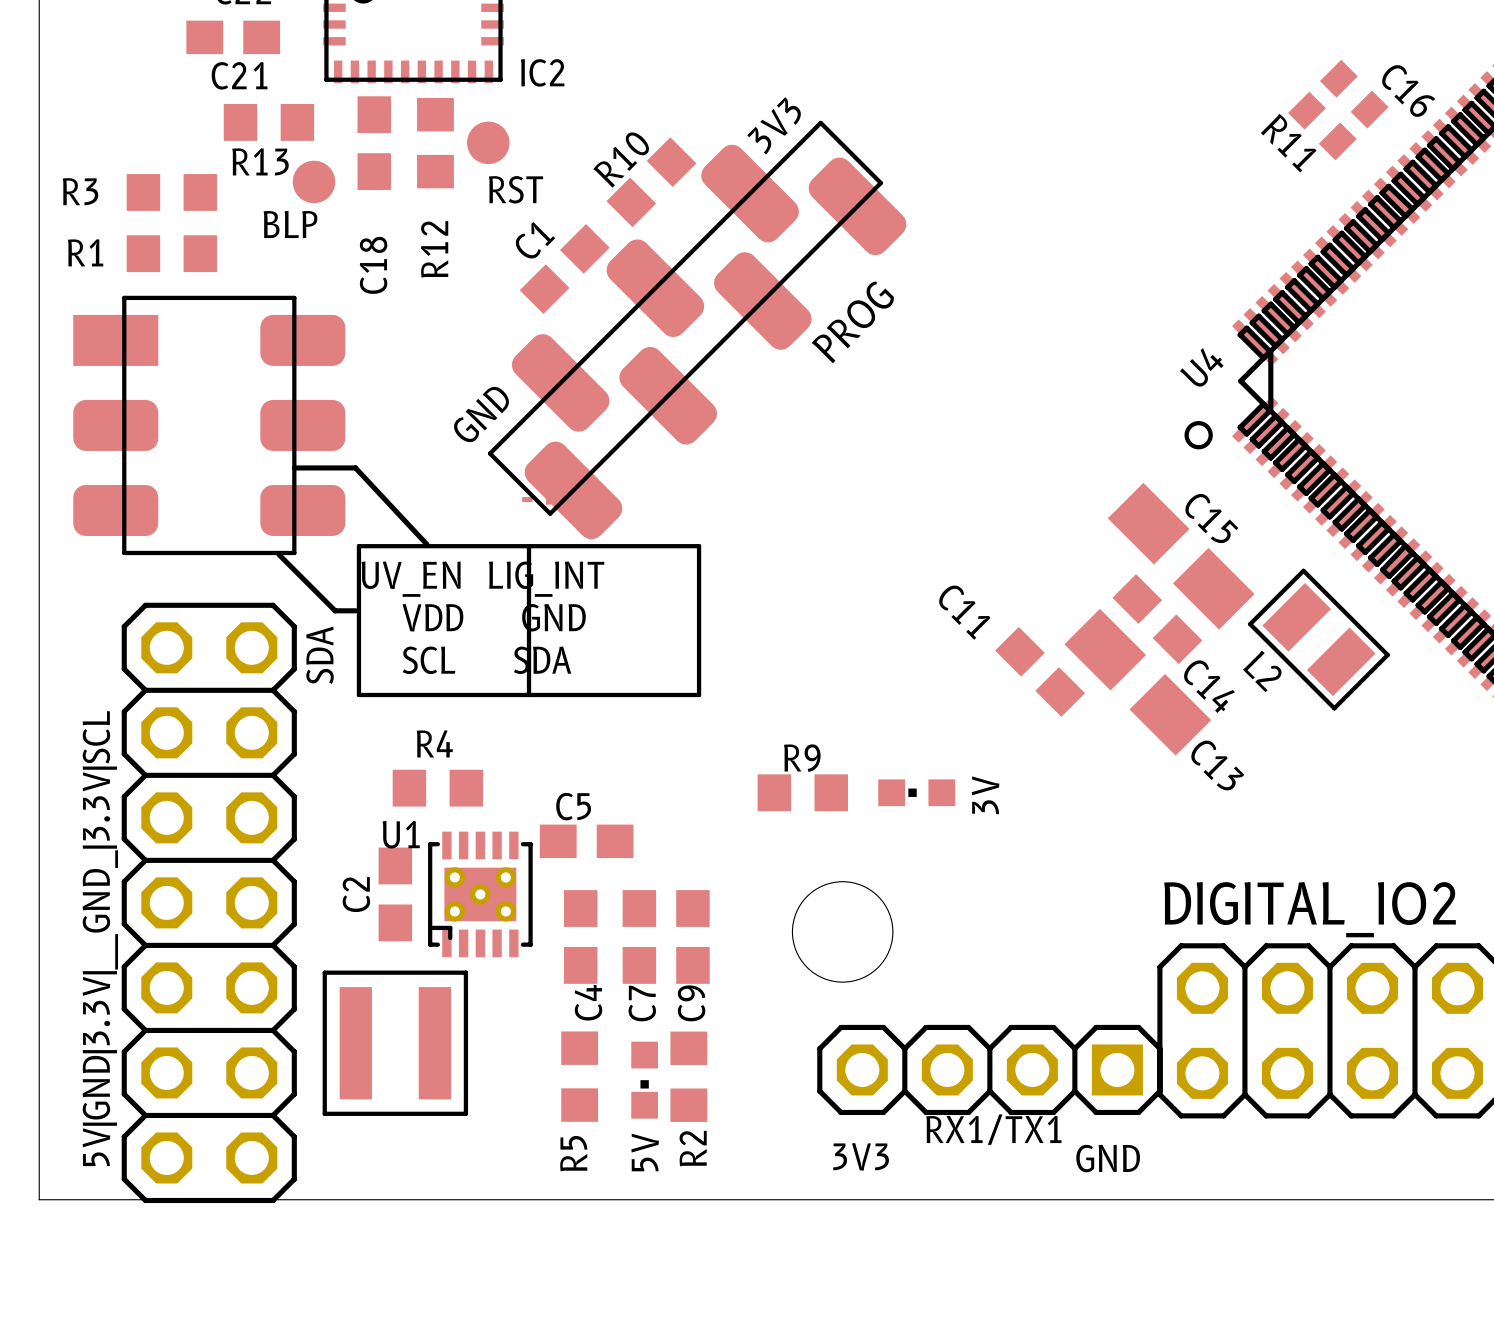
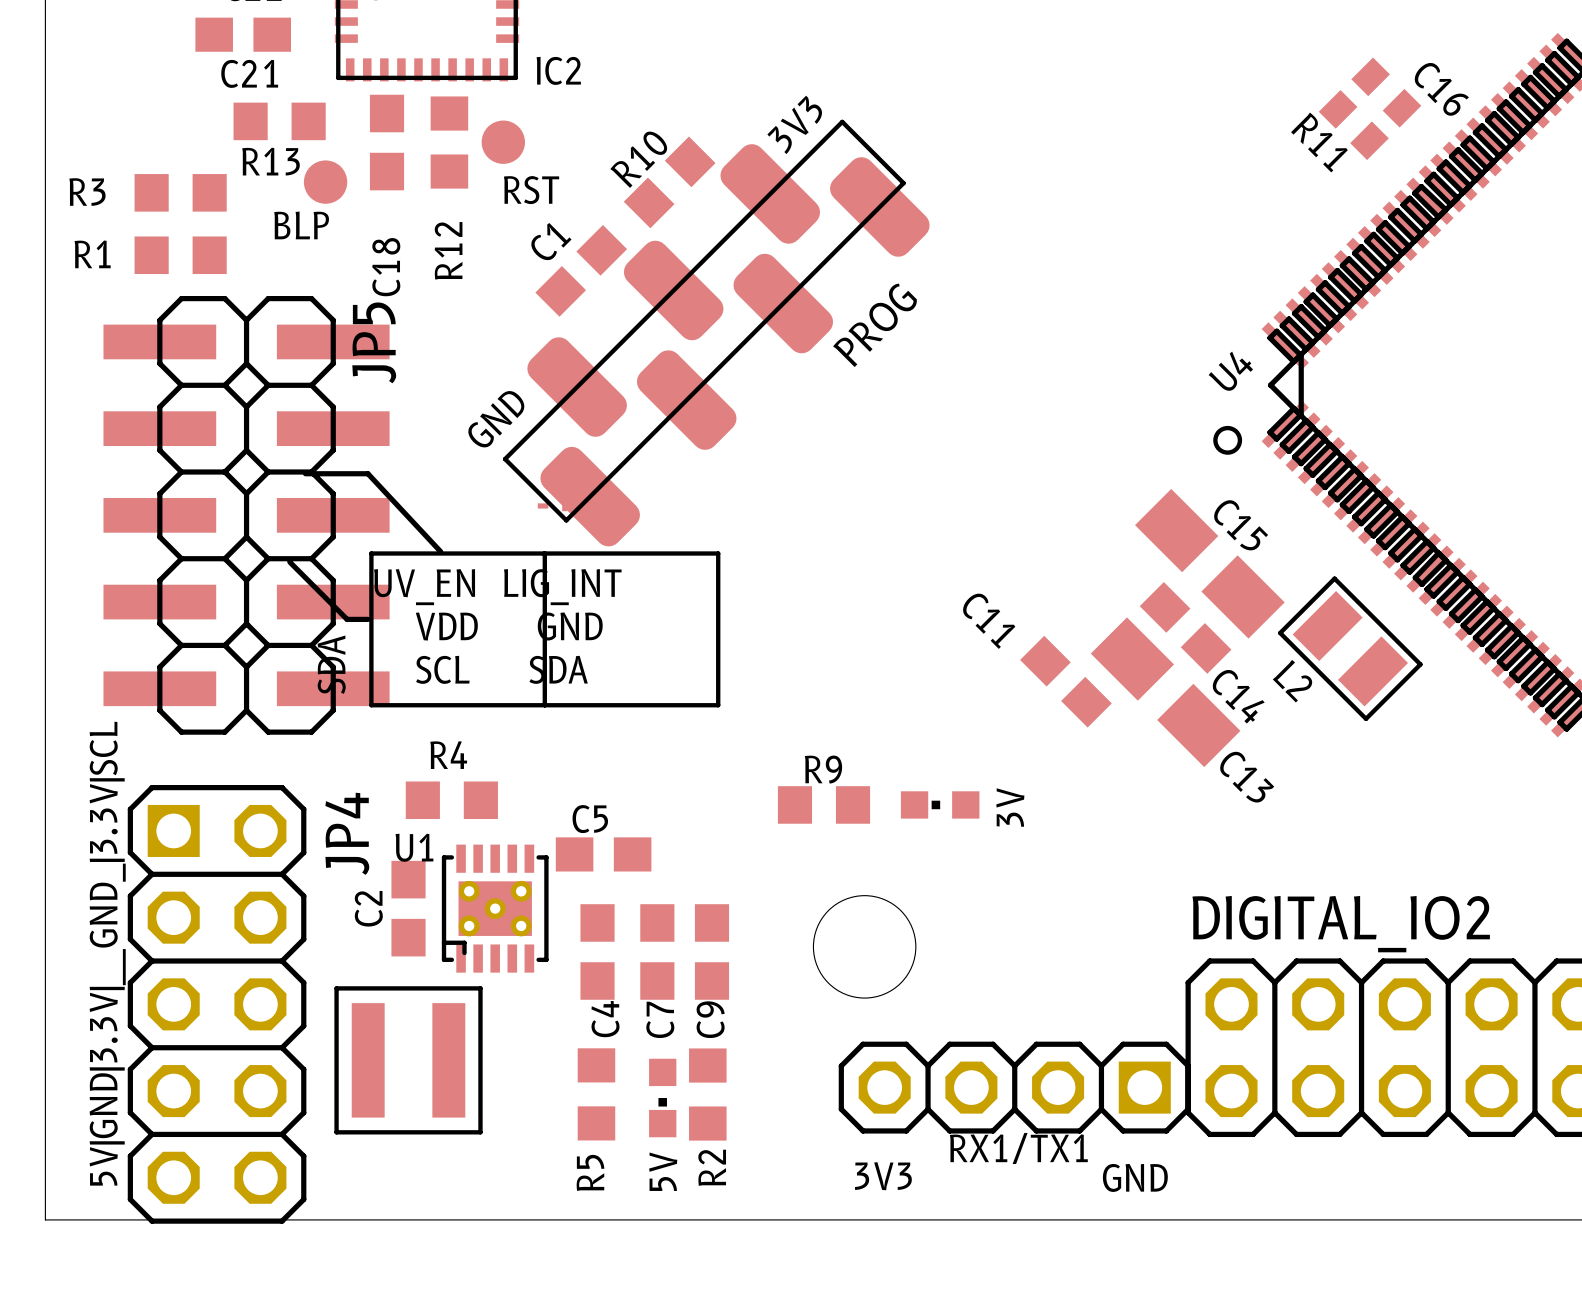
part: (209, 425) -> none
JP5: none -> (246, 515)
part: (209, 902) -> none
JP4: none -> (217, 1004)

